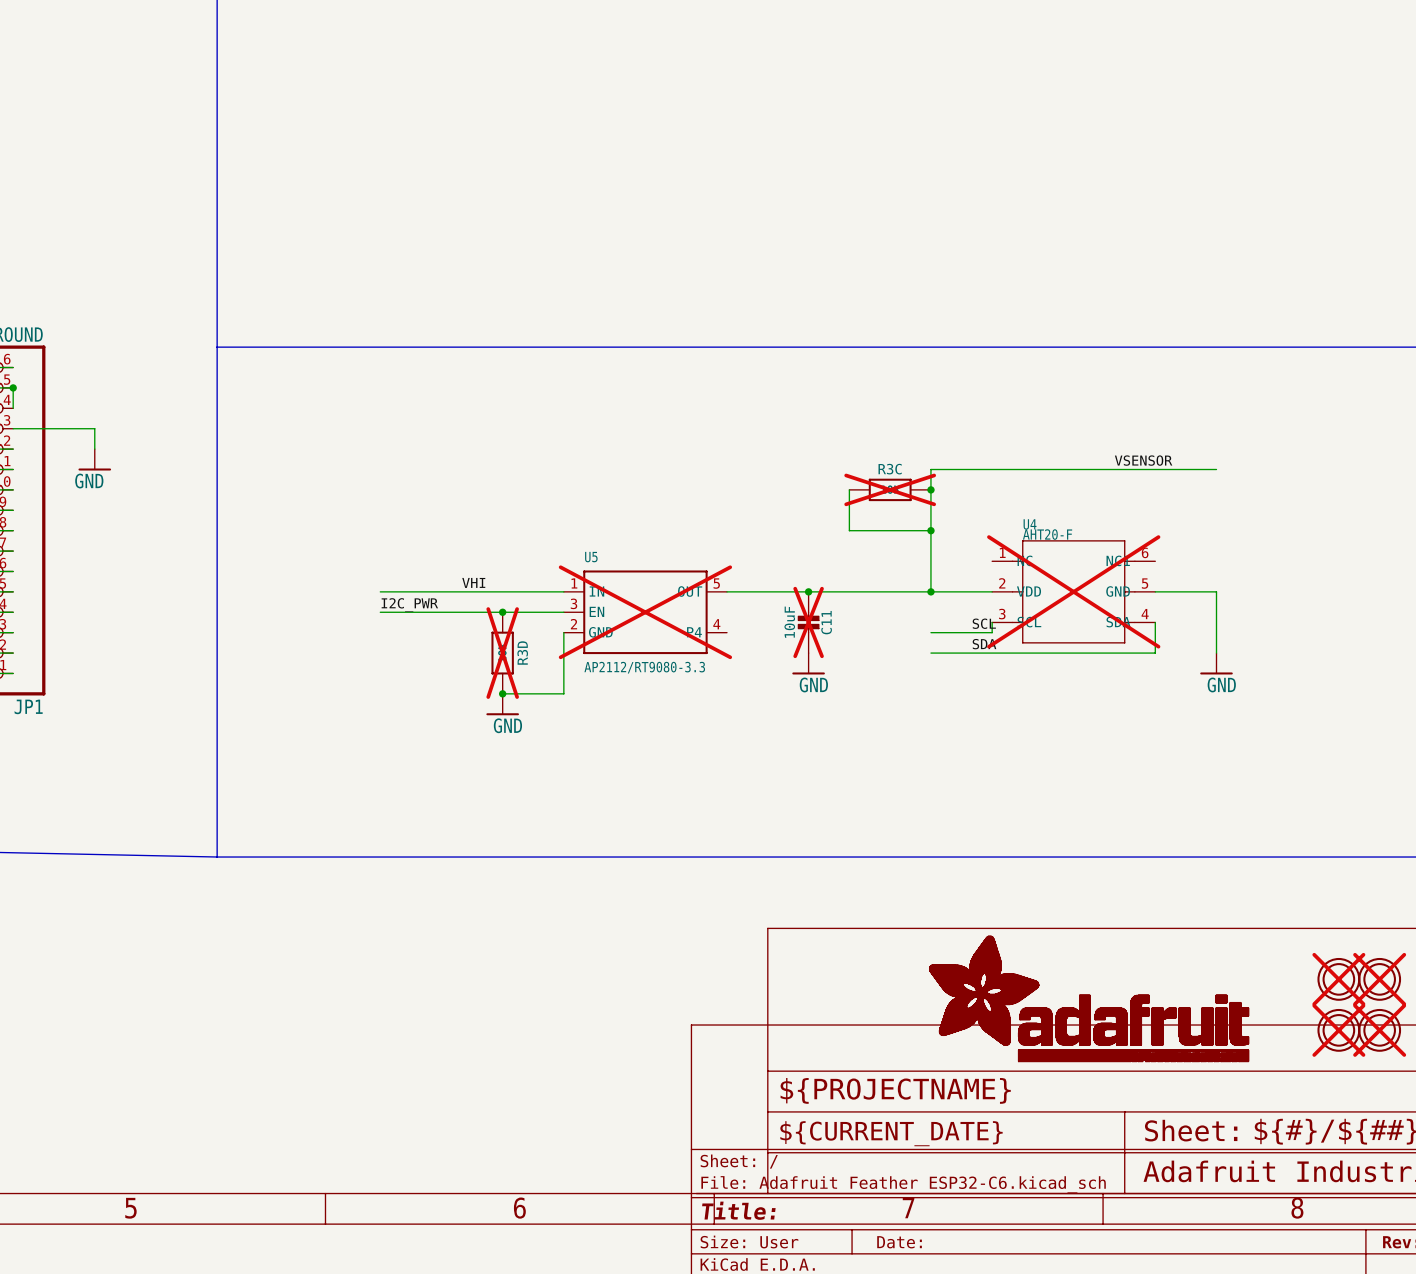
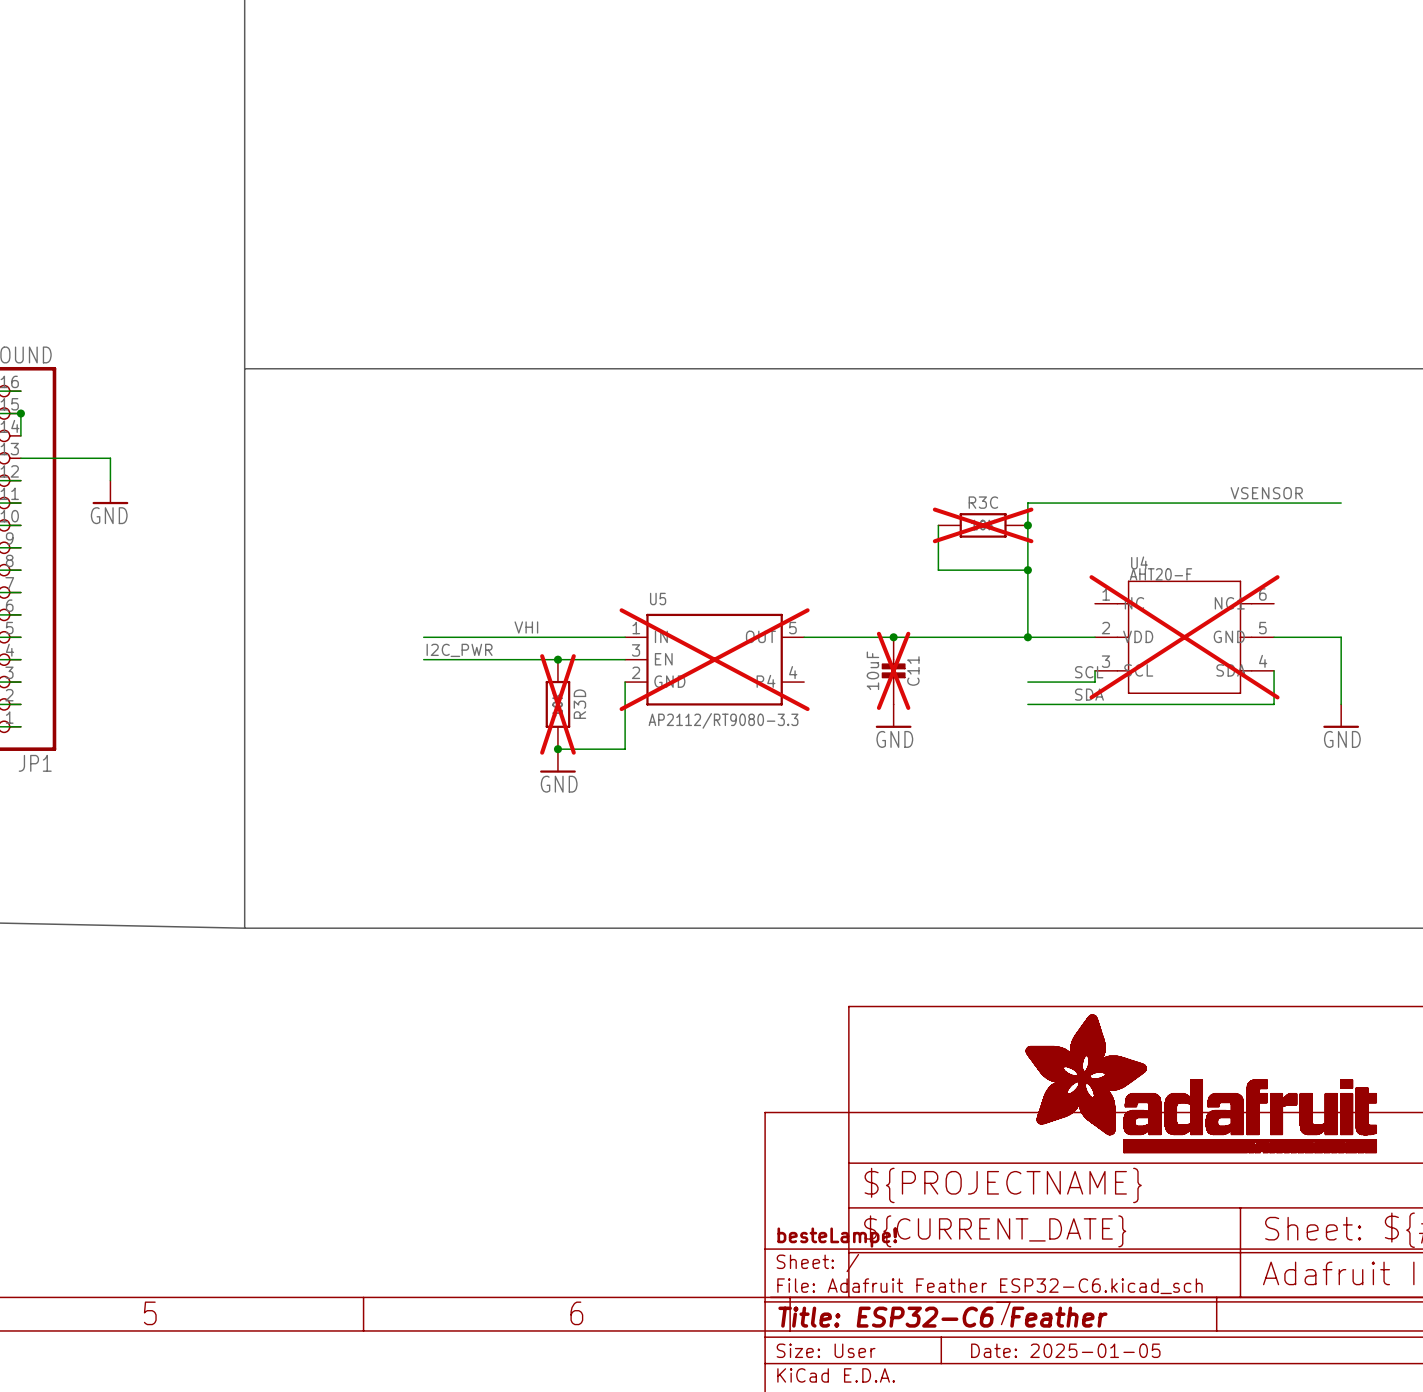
title block: none -> besteLampe! (837, 1237)
title block: Title: (738, 1210) -> Title: ESP32-C6 Feather (942, 1317)
title block: Date: (899, 1242) -> Date: 2025-01-05 (1065, 1350)

